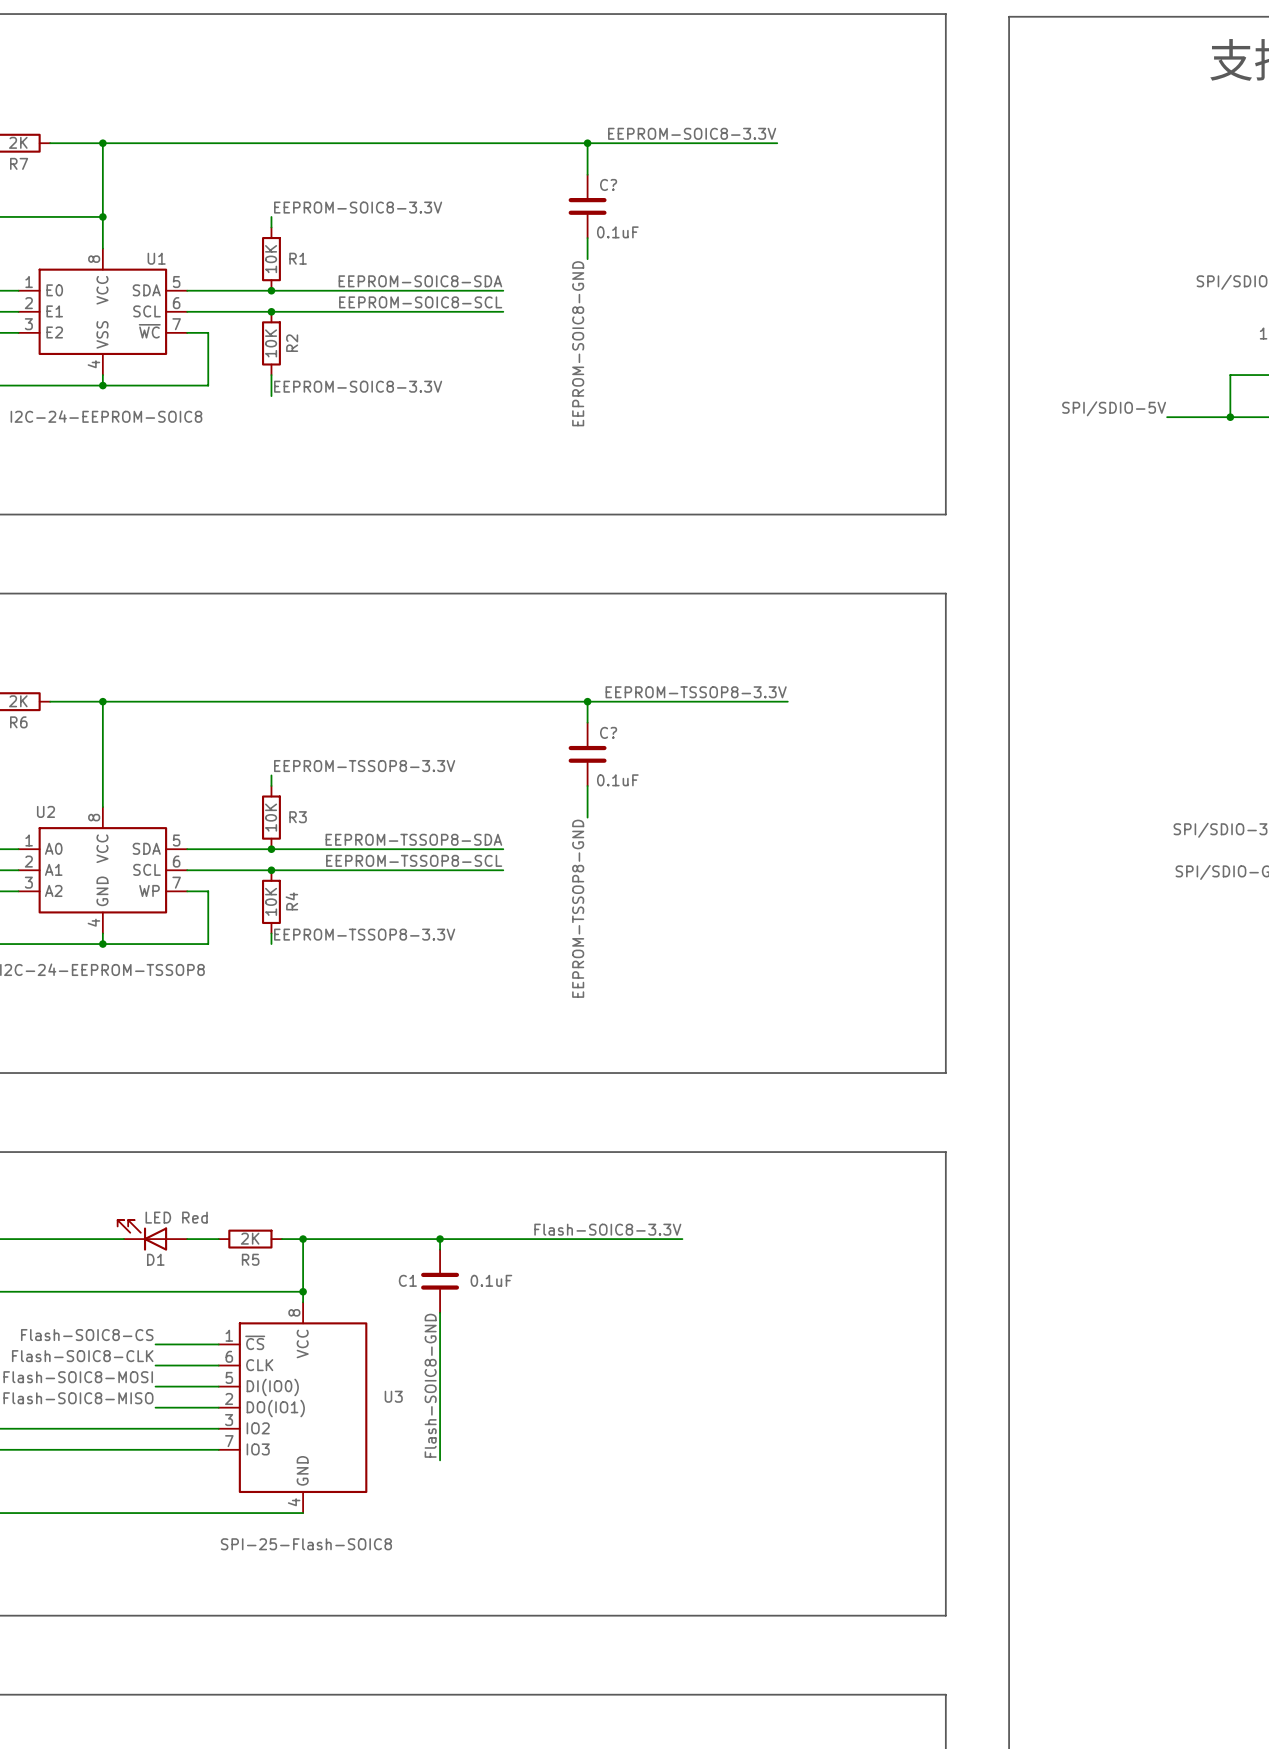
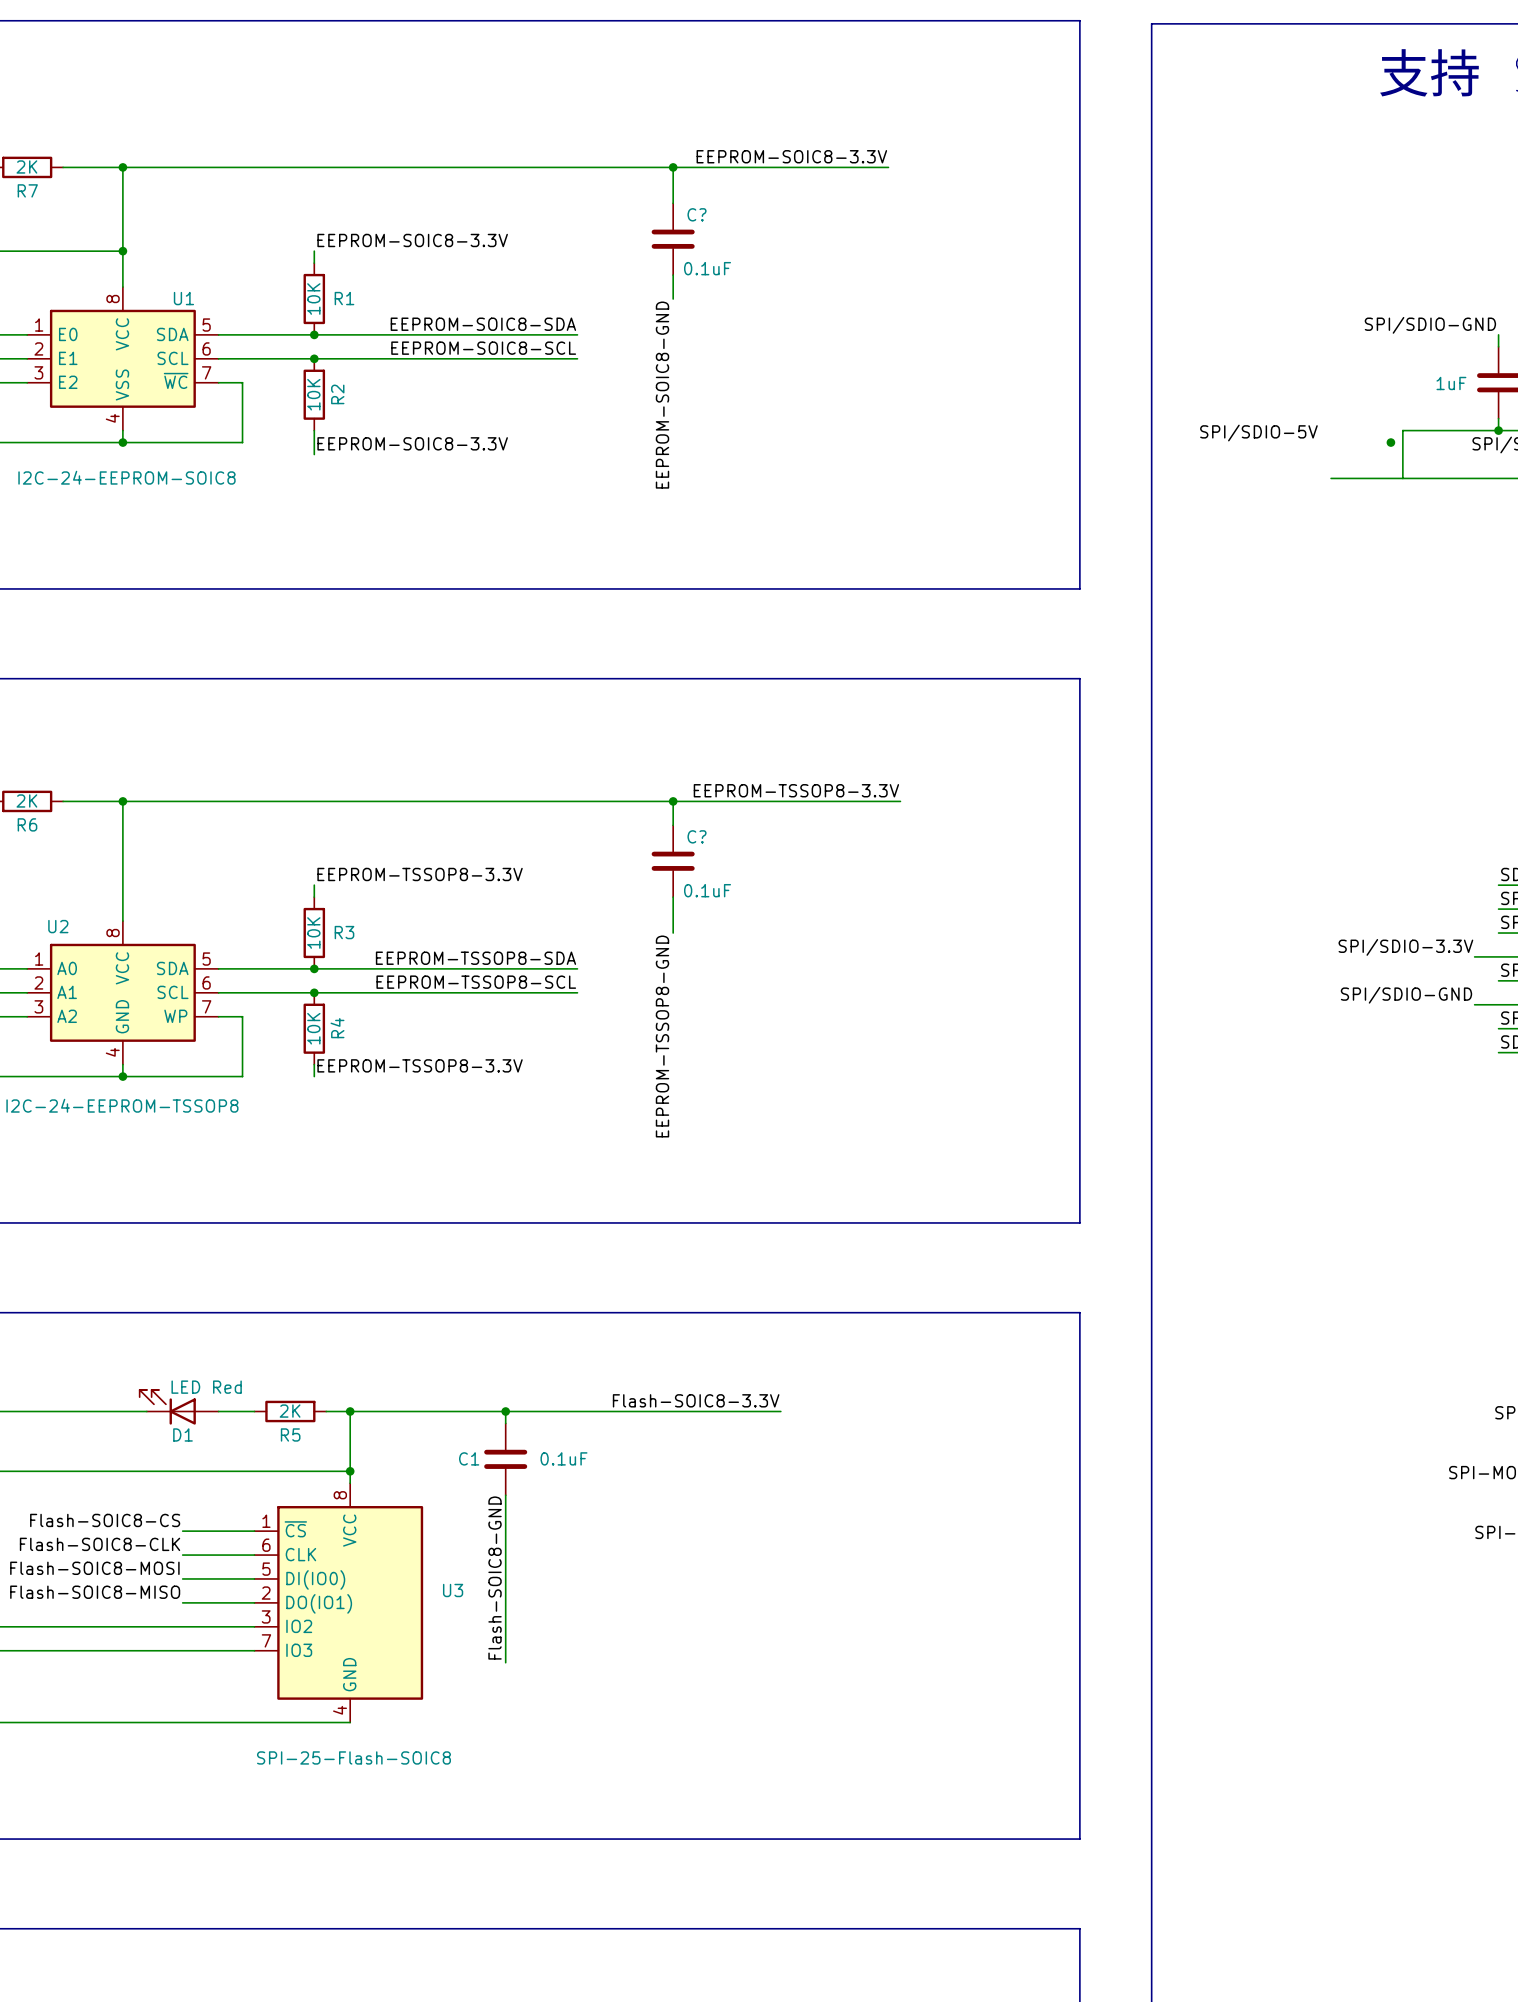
label position: SPI/SDIO-5V (1114, 408) -> SPI/SDIO-5V (1258, 433)
junction position: (1230, 417) -> (1390, 442)

